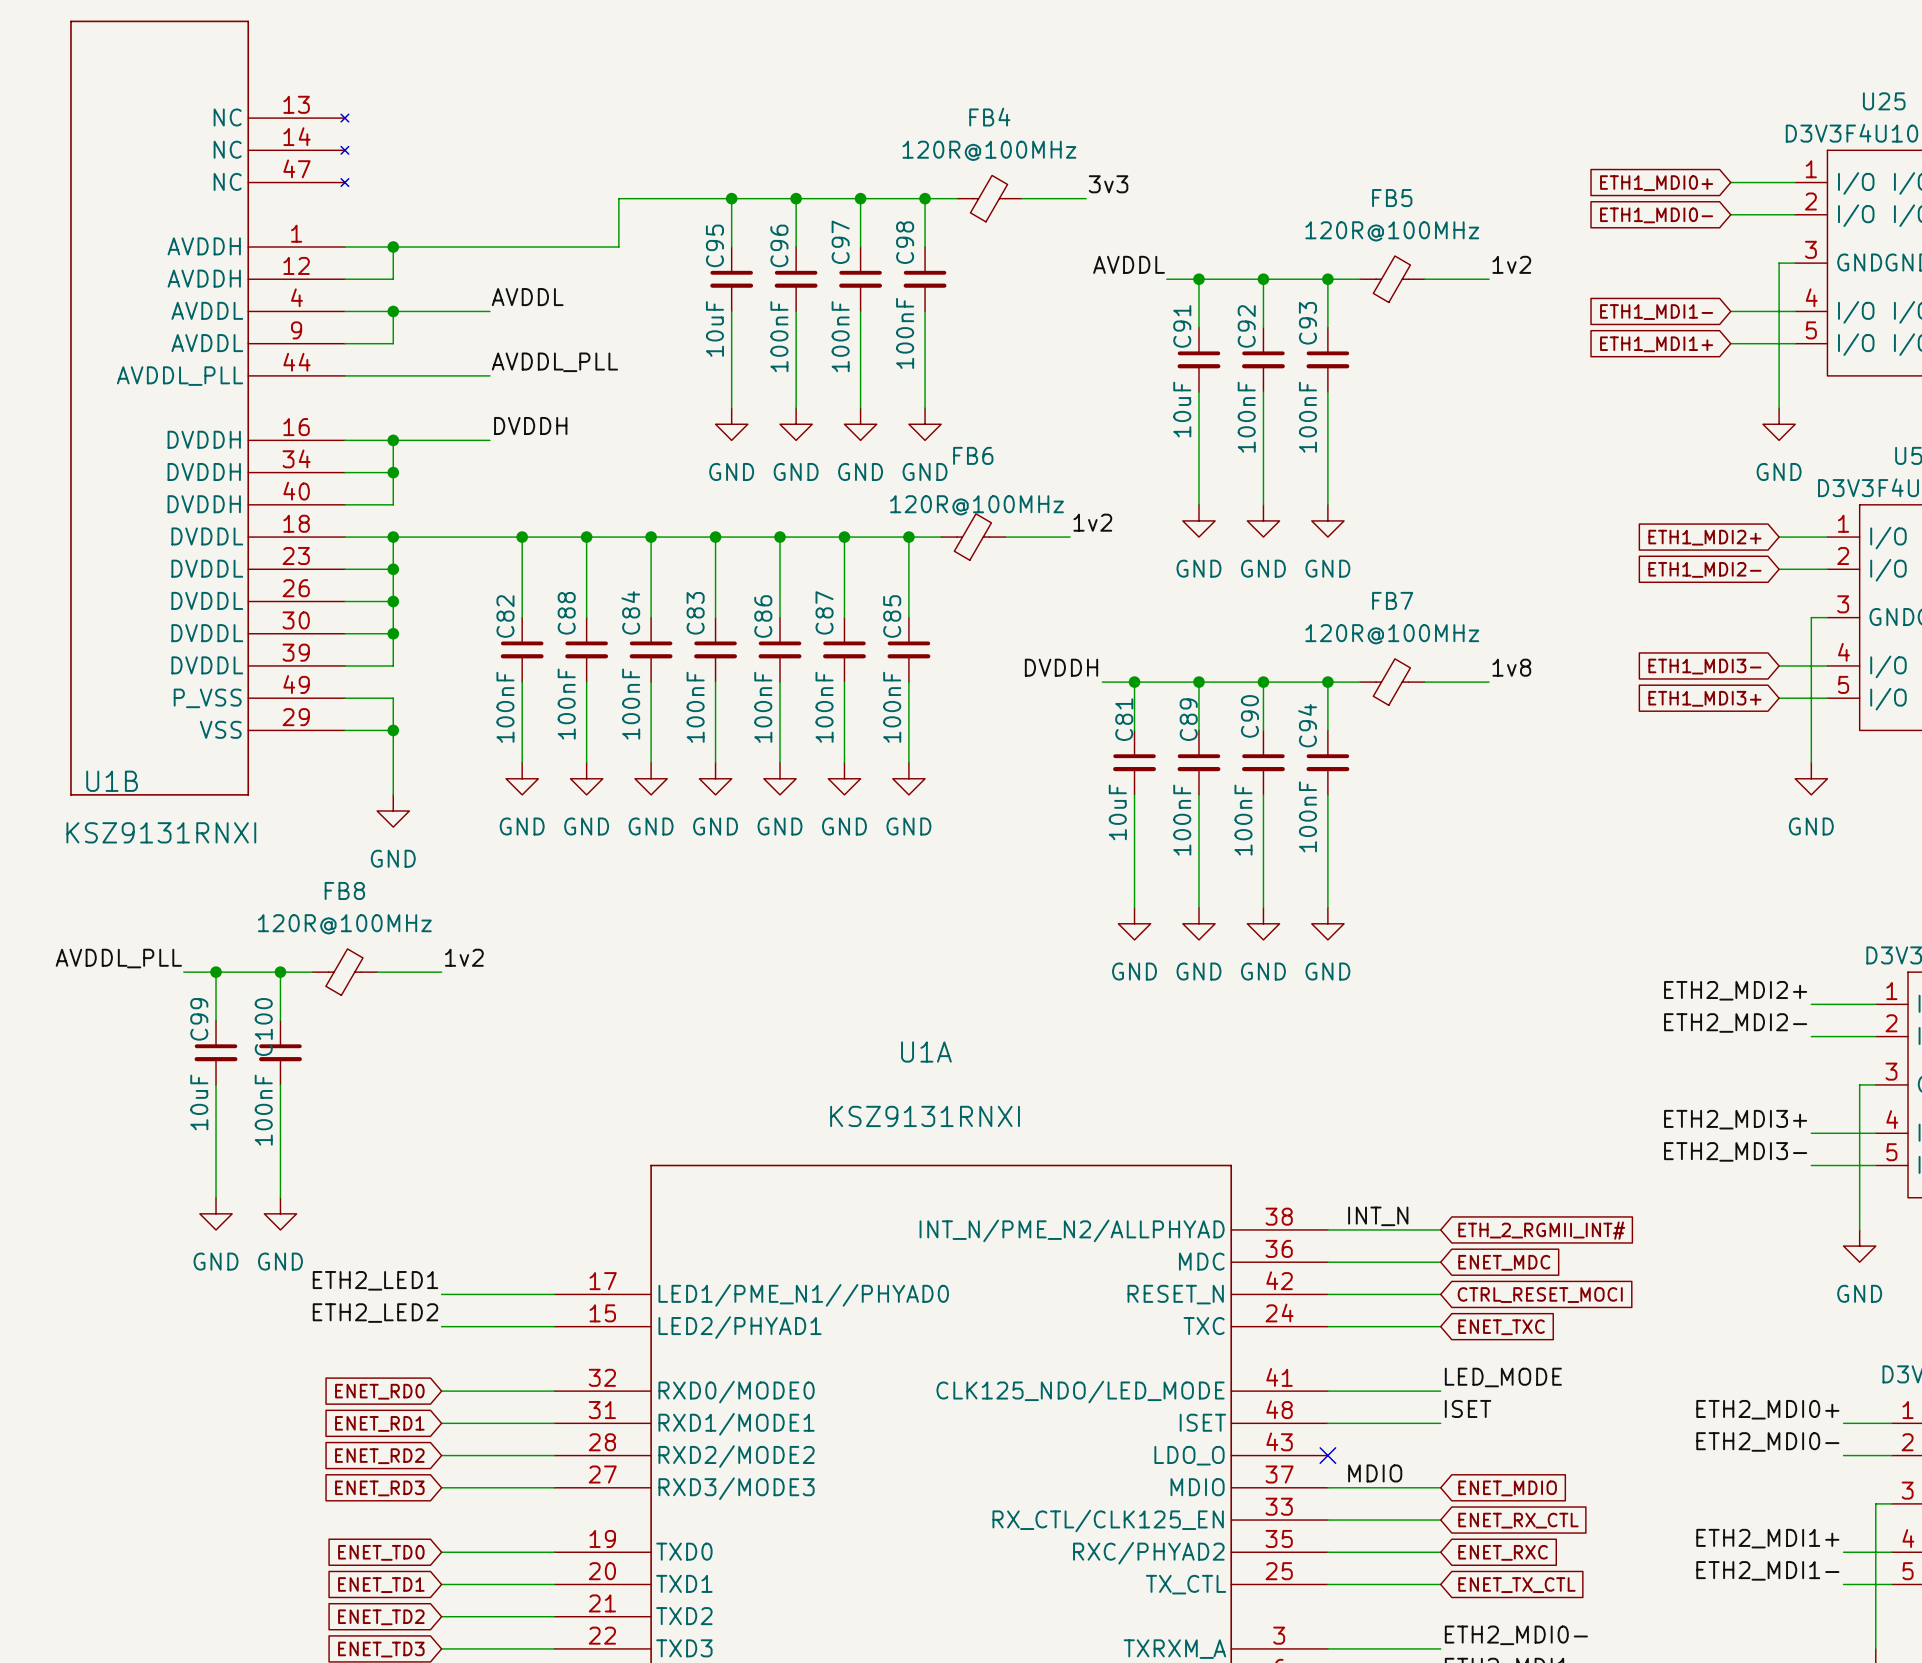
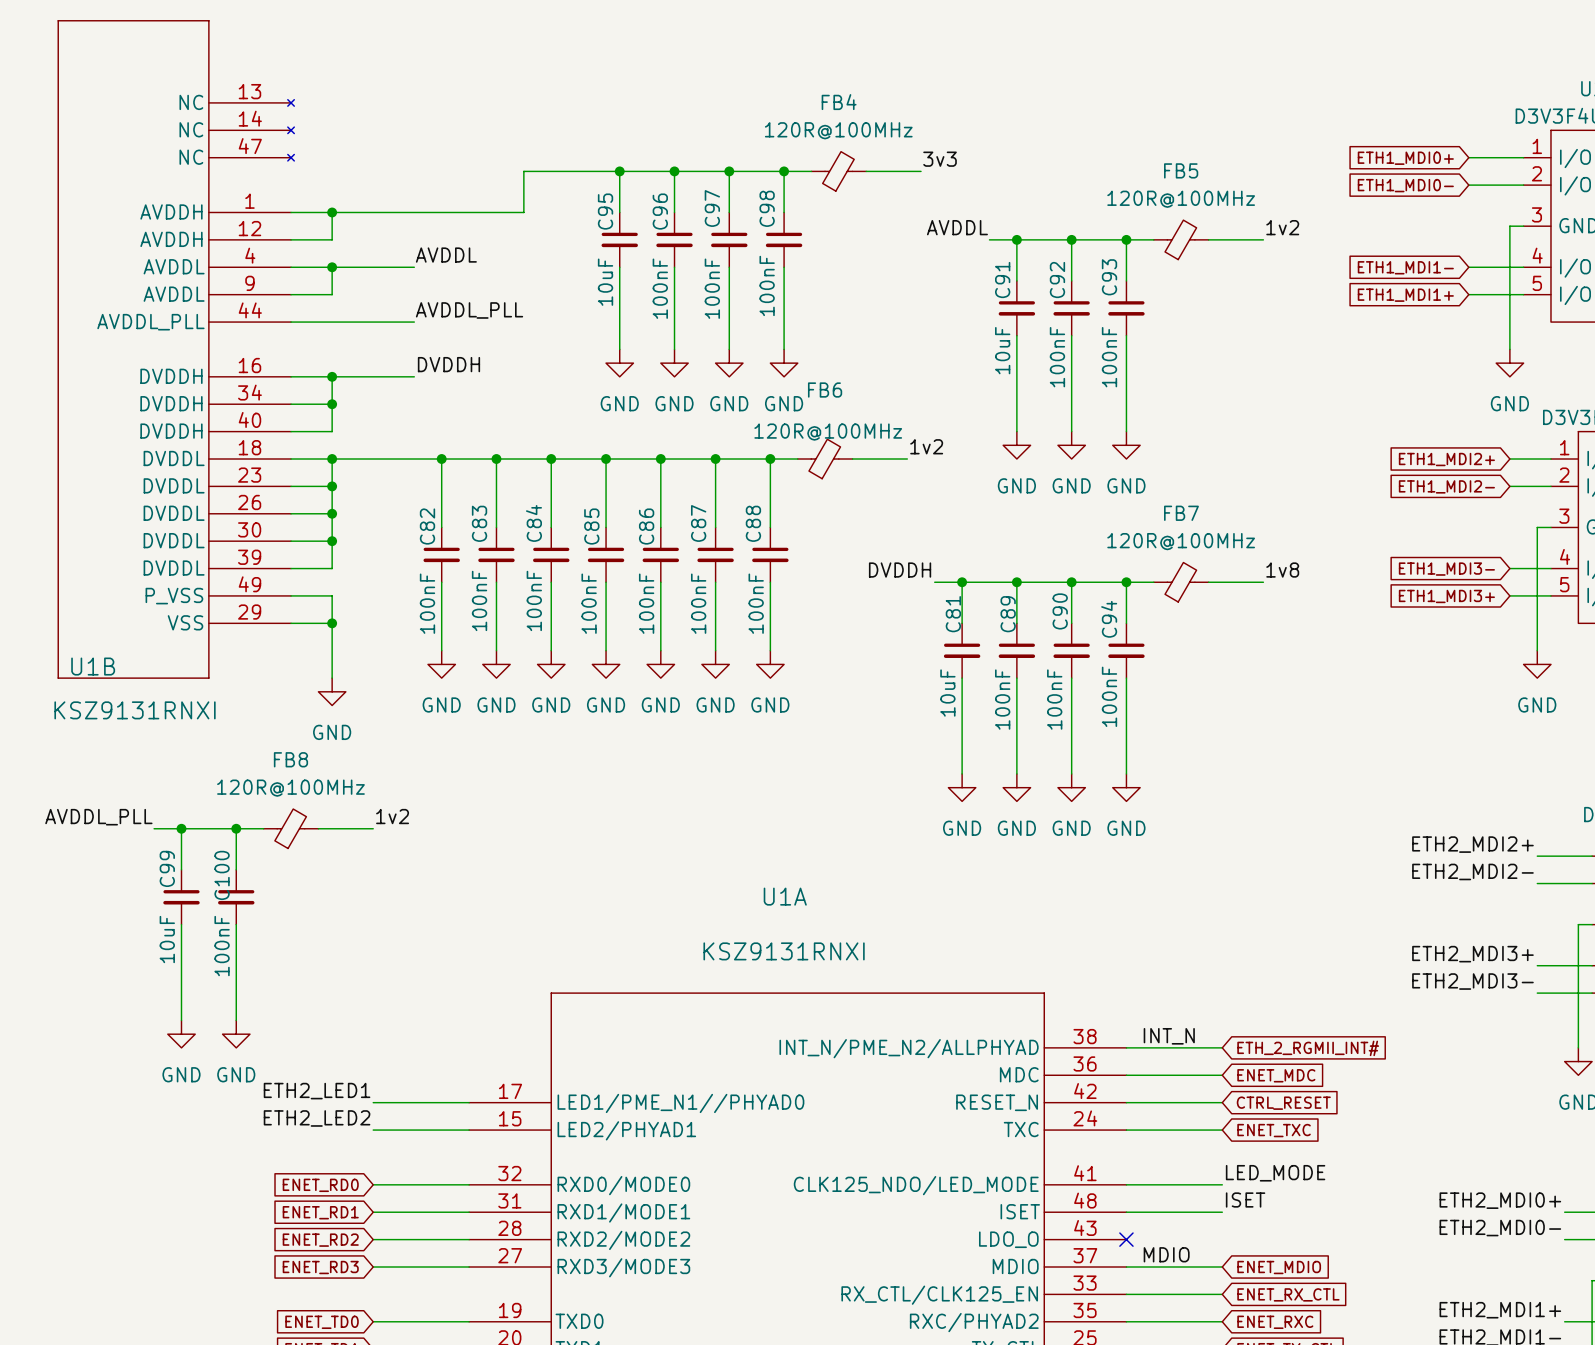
C88 name: C88 (566, 613) -> C83 (479, 523)
C83 name: C83 (695, 613) -> C85 (591, 526)
C85 name: C85 (892, 616) -> C88 (753, 523)
global label: CTRL_RESET_MOCI (1540, 1295) -> CTRL_RESET (1283, 1103)

